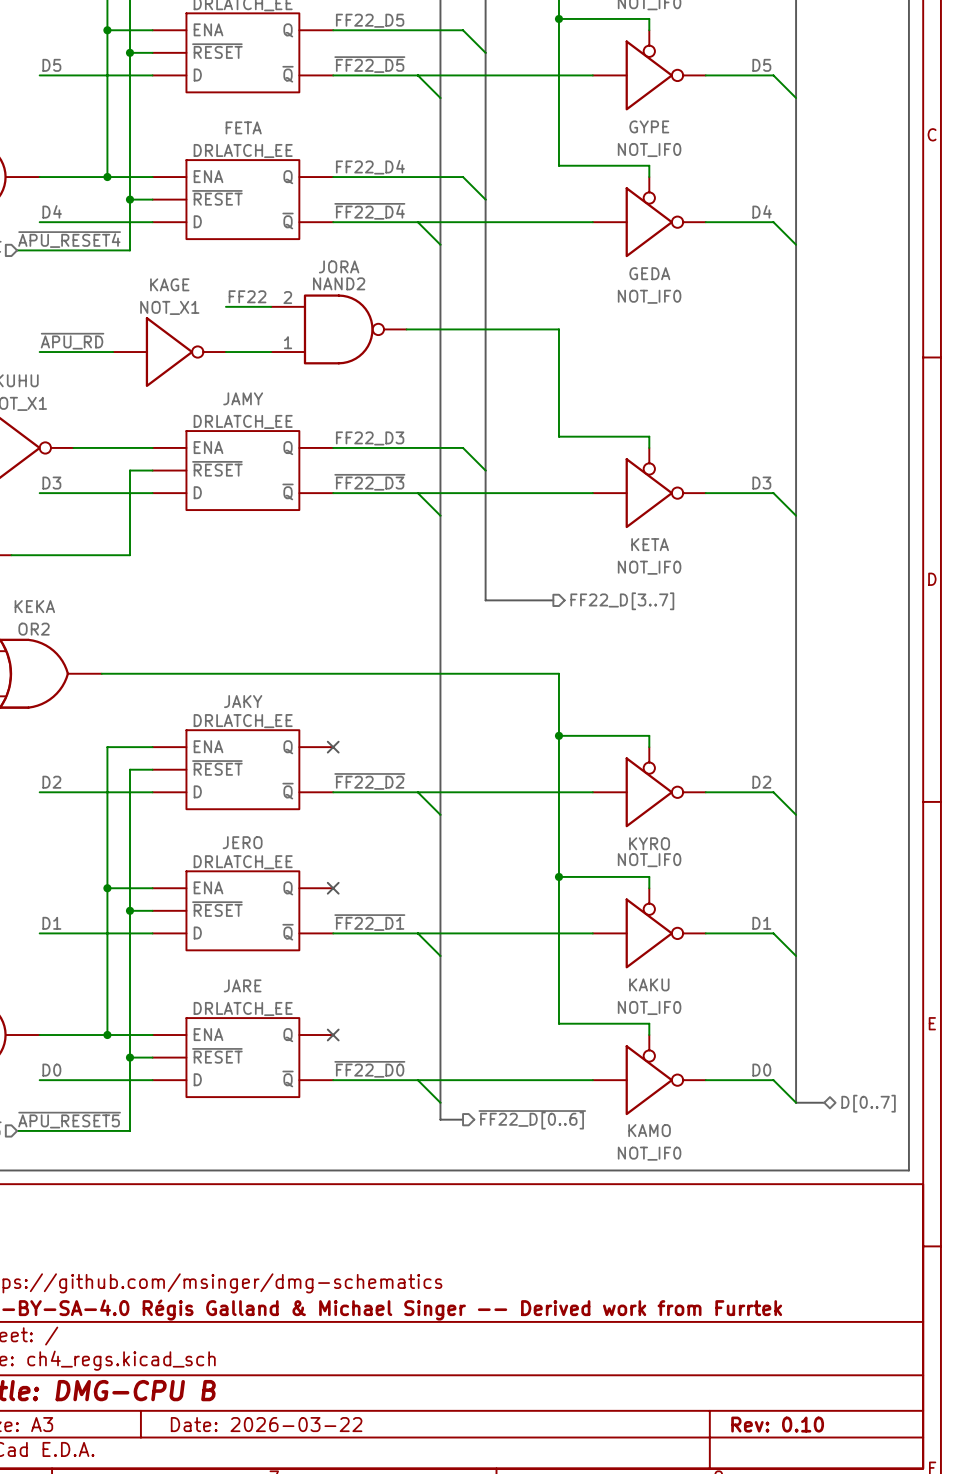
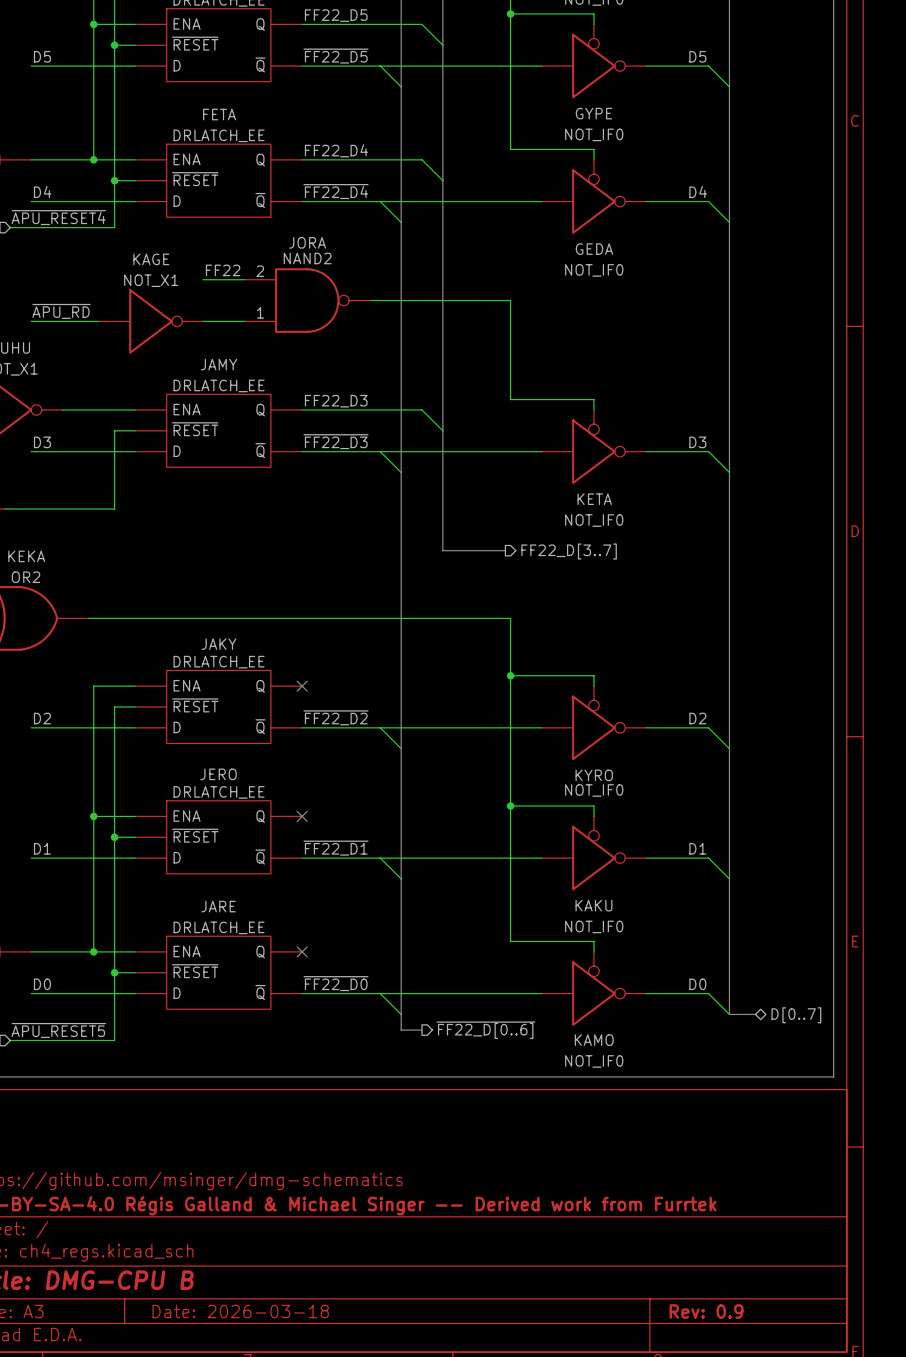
title block: Date: 2026-03-22 (266, 1424) -> Date: 2026-03-18 (240, 1311)
title block: Rev: 0.10 (777, 1424) -> Rev: 0.9 (706, 1311)

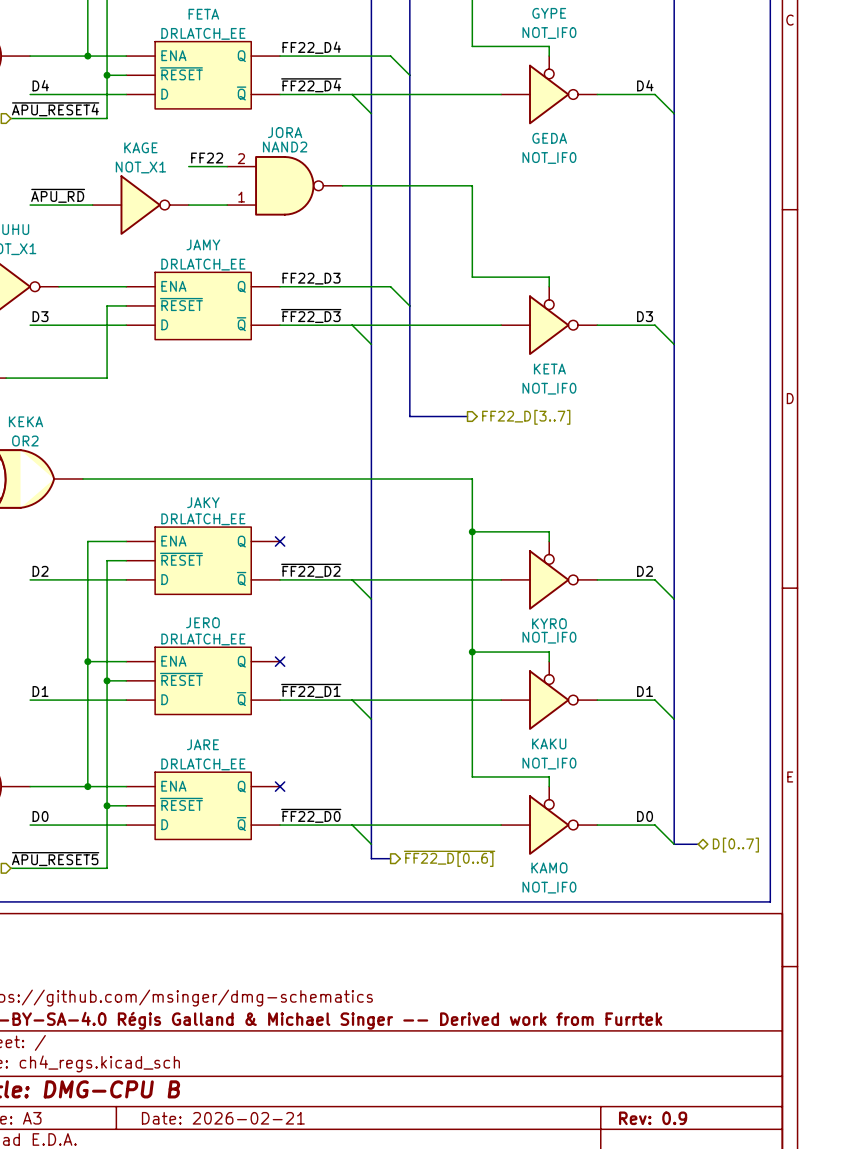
title block: Date: 2026-03-18 (240, 1311) -> Date: 2026-02-21 (223, 1118)

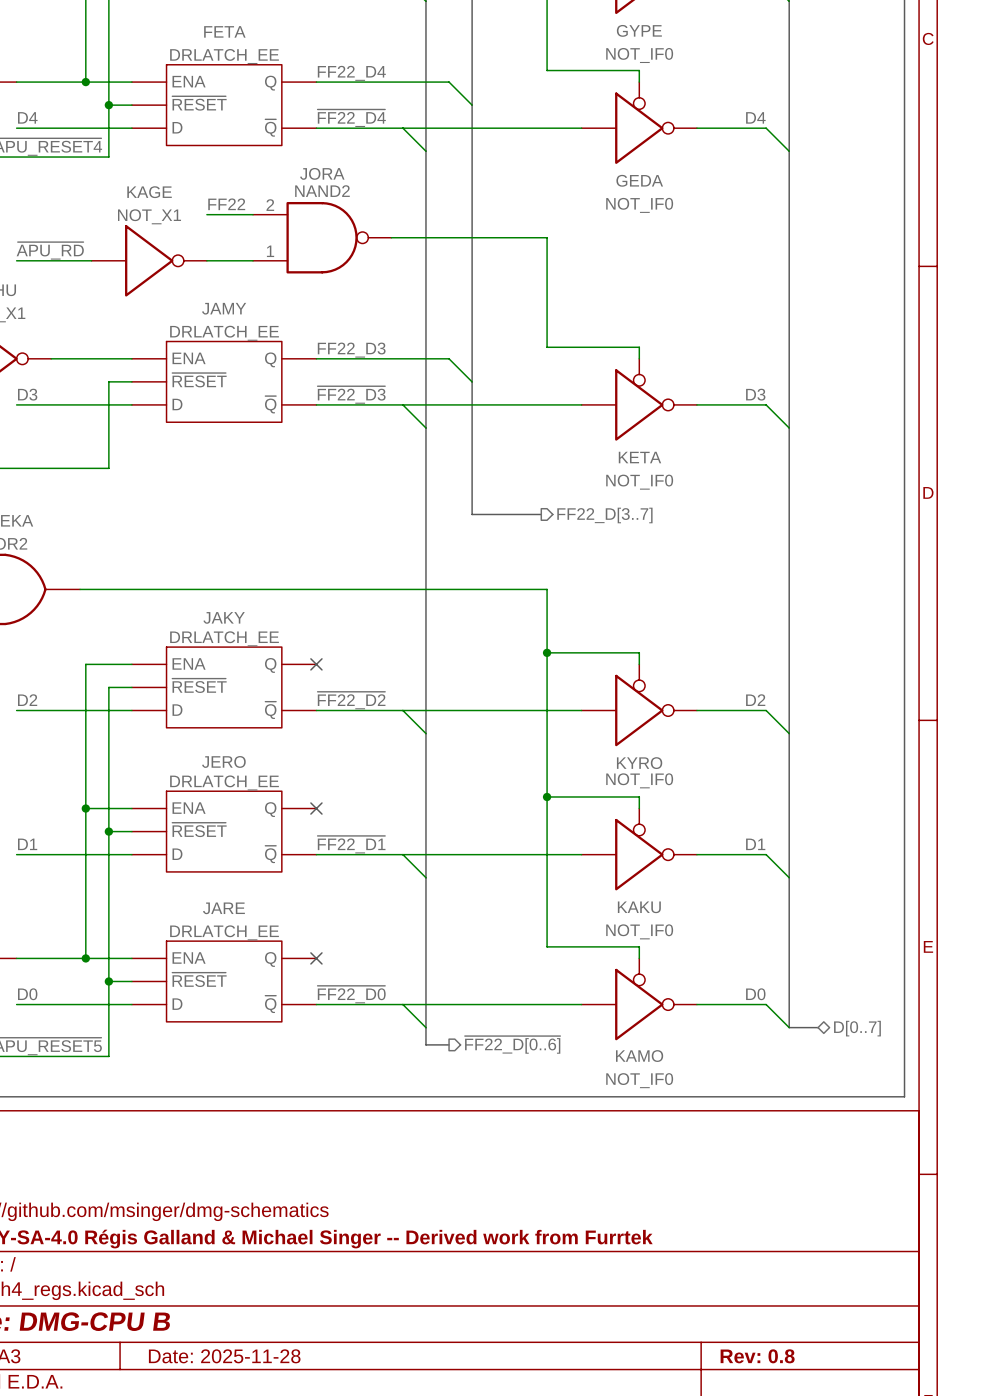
title block: Date: 2026-02-21 (223, 1118) -> Date: 2025-11-28 (224, 1356)
title block: Rev: 0.9 (653, 1118) -> Rev: 0.8 (757, 1356)

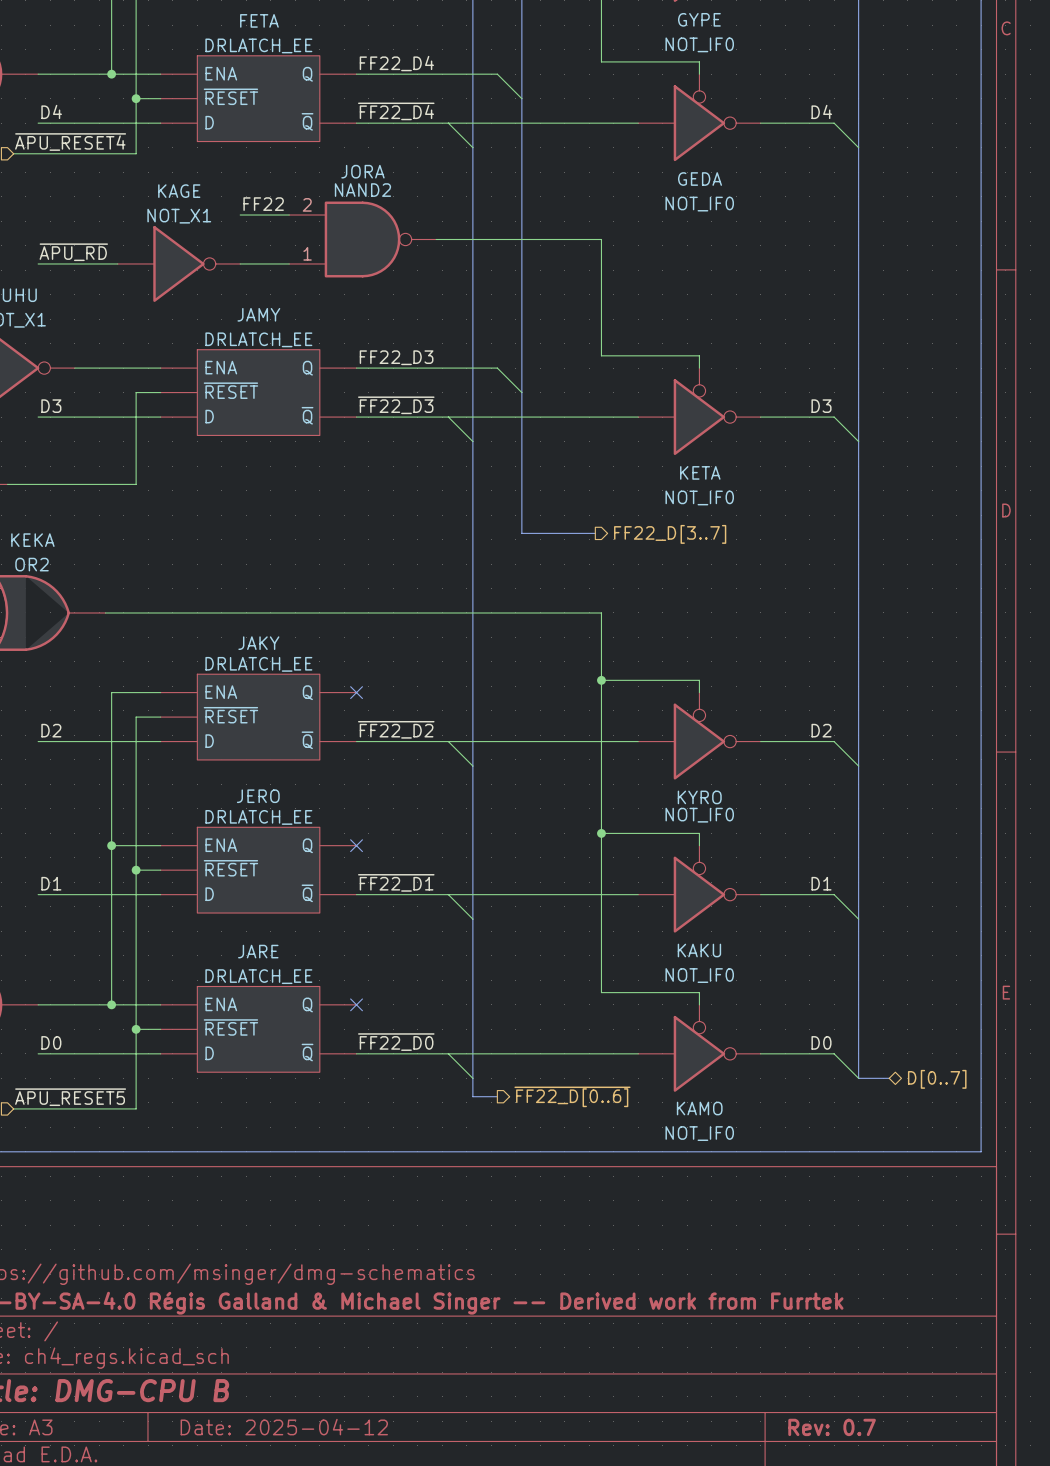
title block: Date: 2025-11-28 (224, 1356) -> Date: 2025-04-12 (284, 1427)
title block: Rev: 0.8 (757, 1356) -> Rev: 0.7 (832, 1427)

